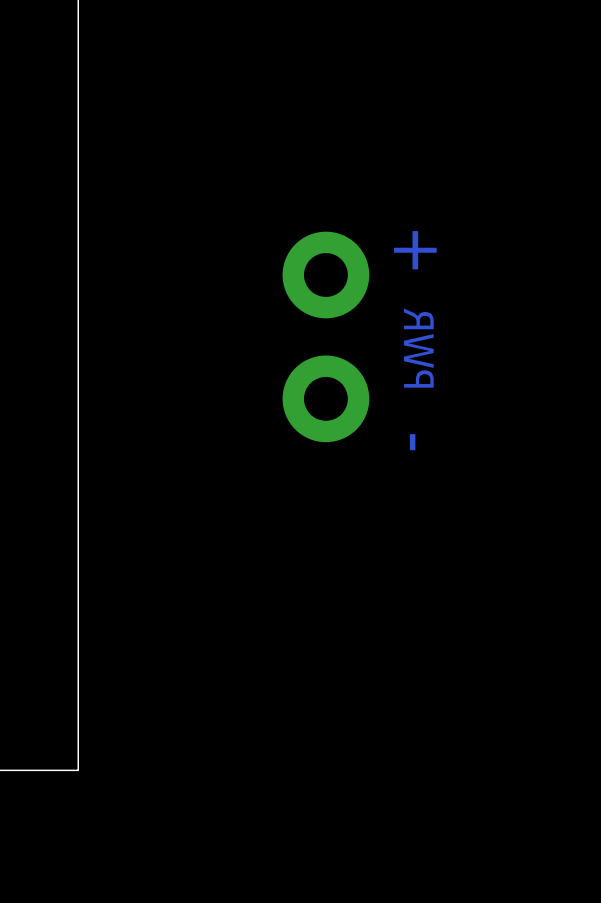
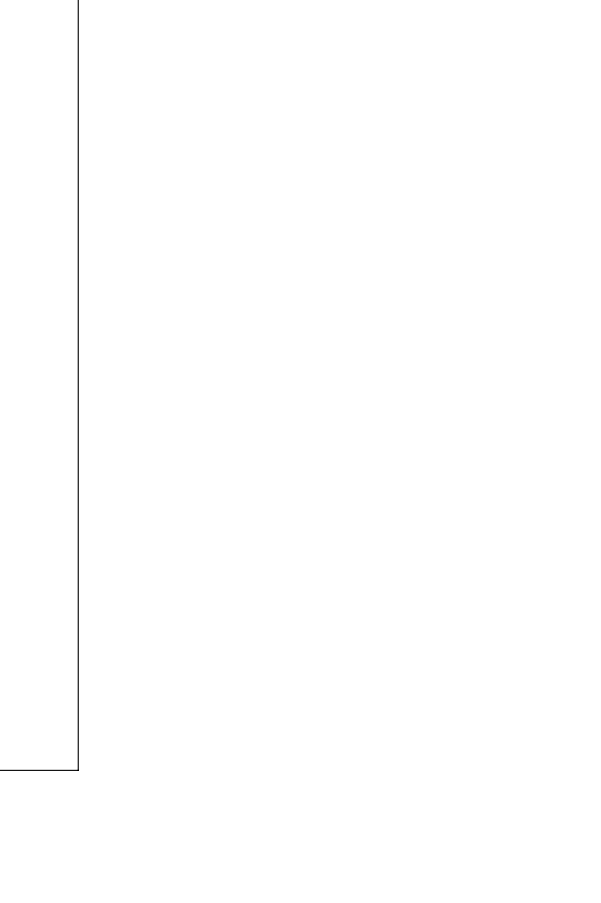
part: (325, 336) -> none

